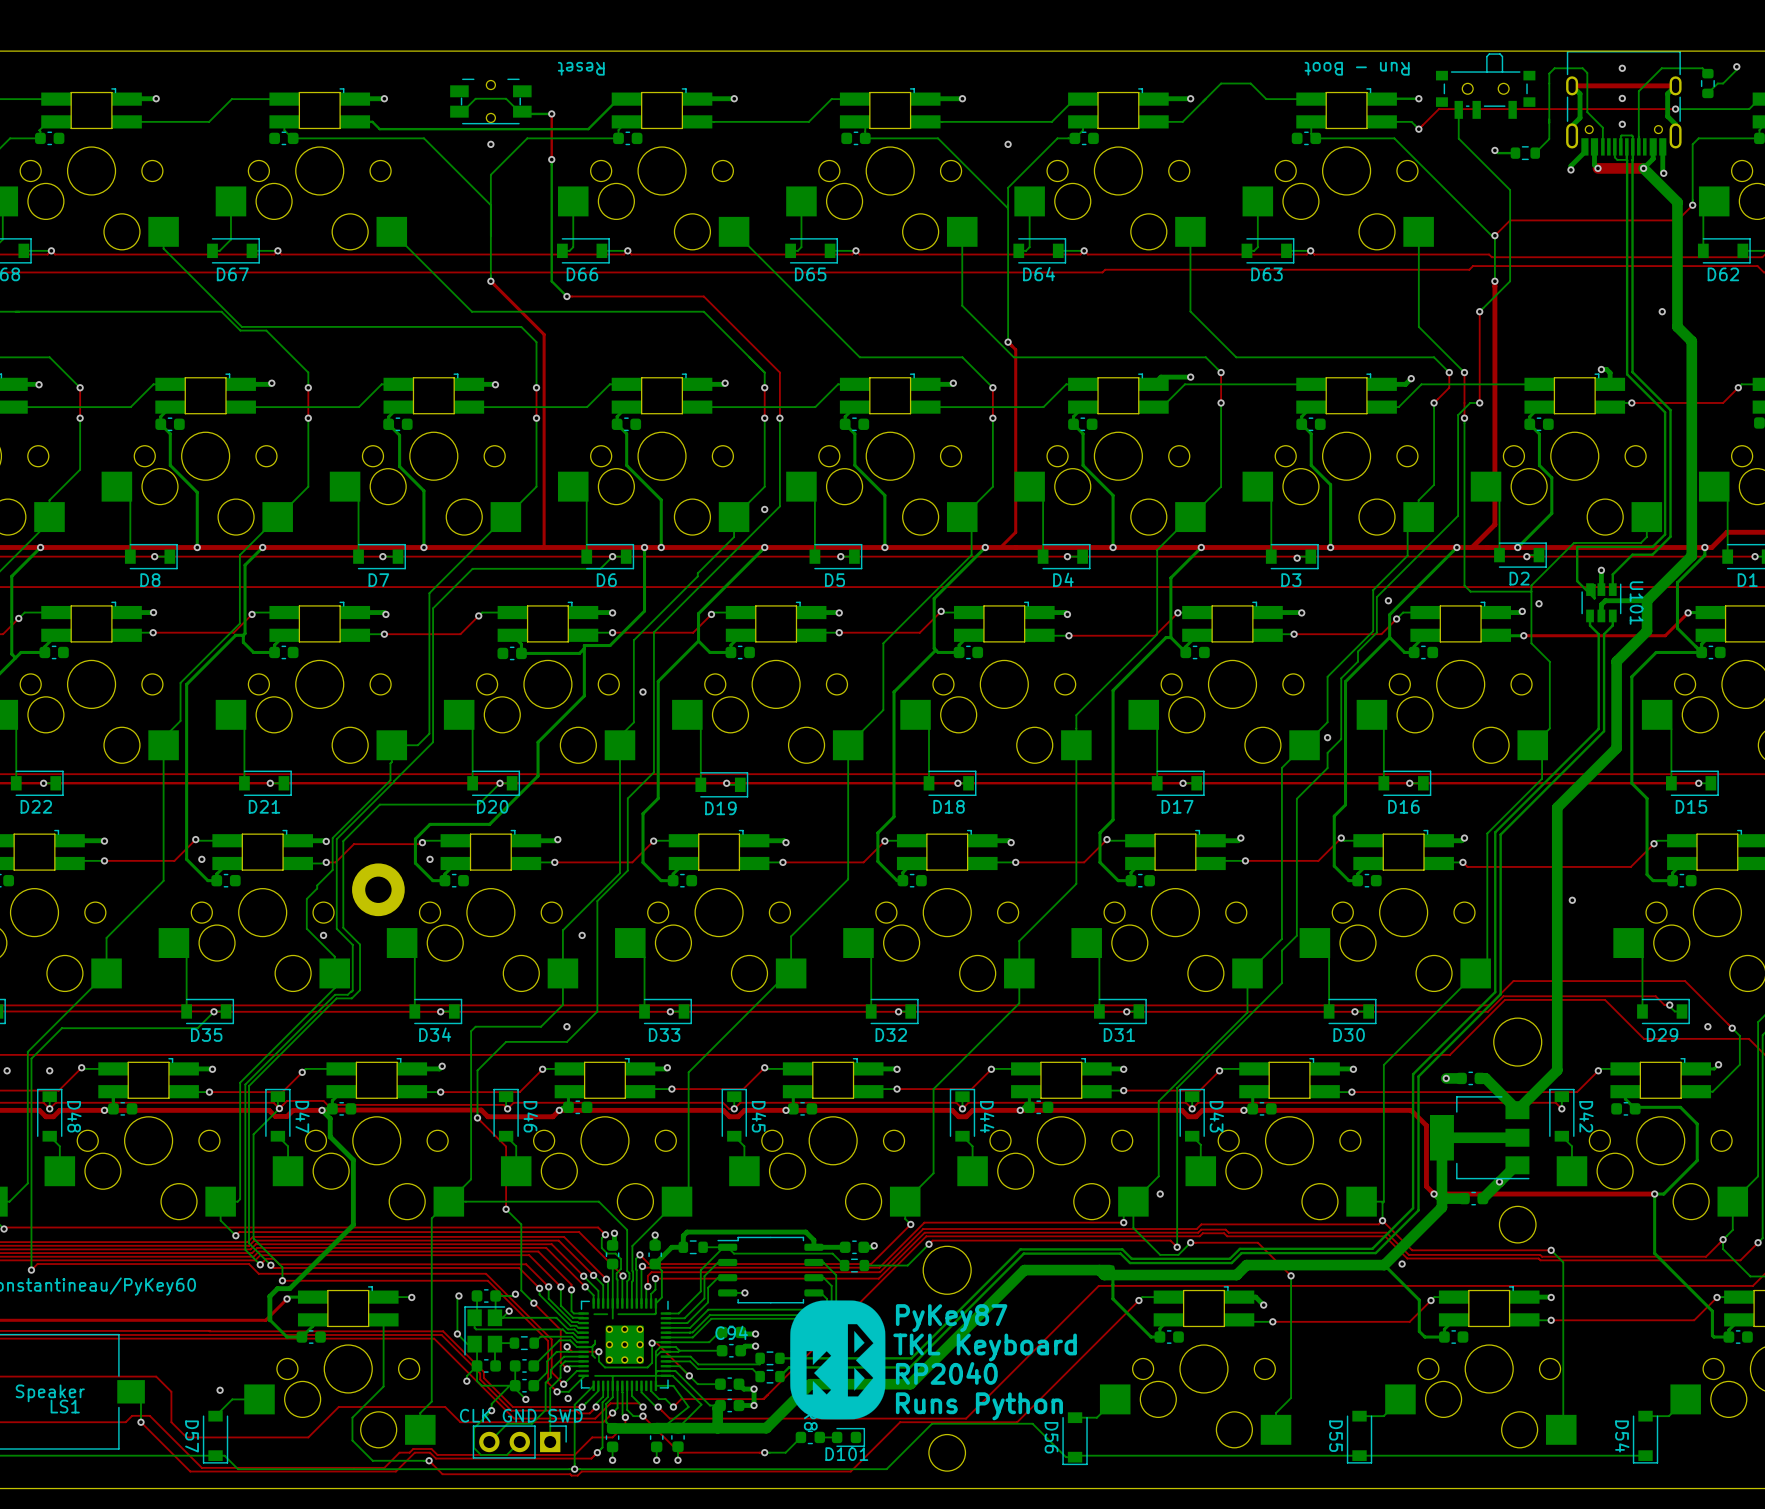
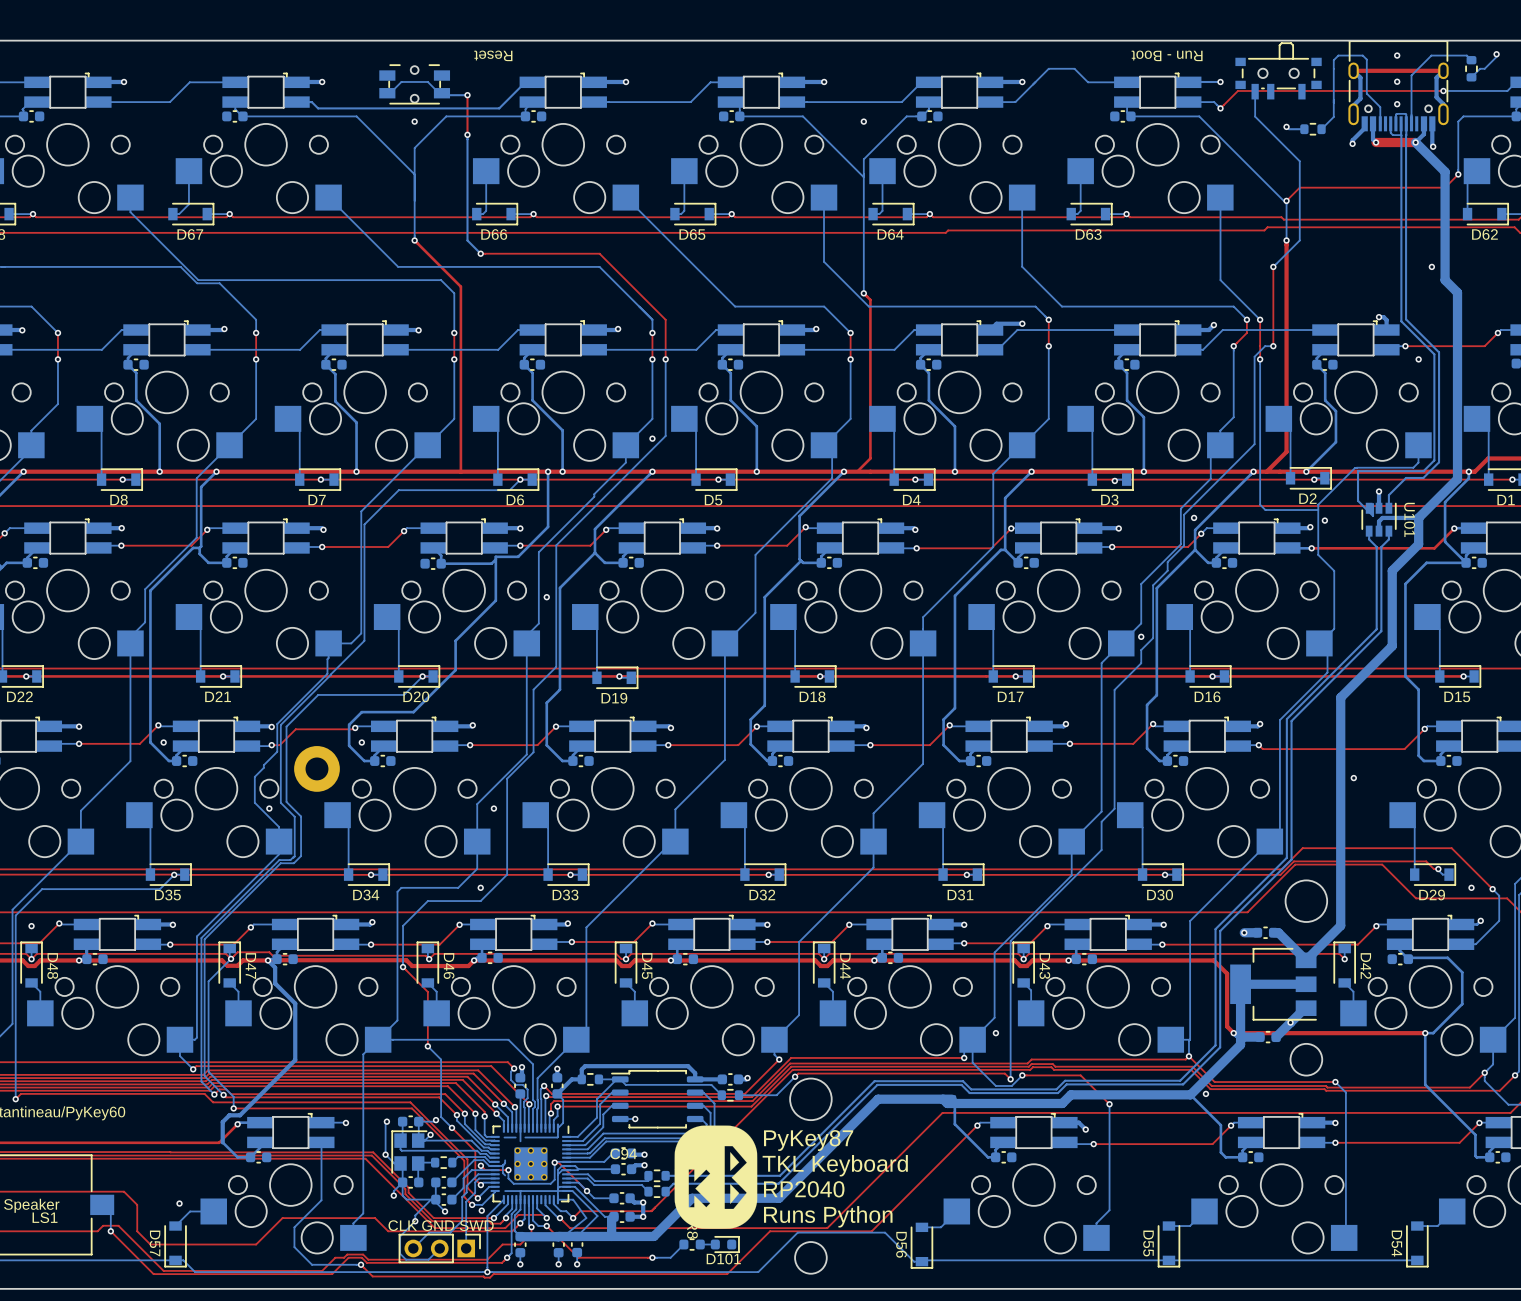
via: none -> (1418, 359)

